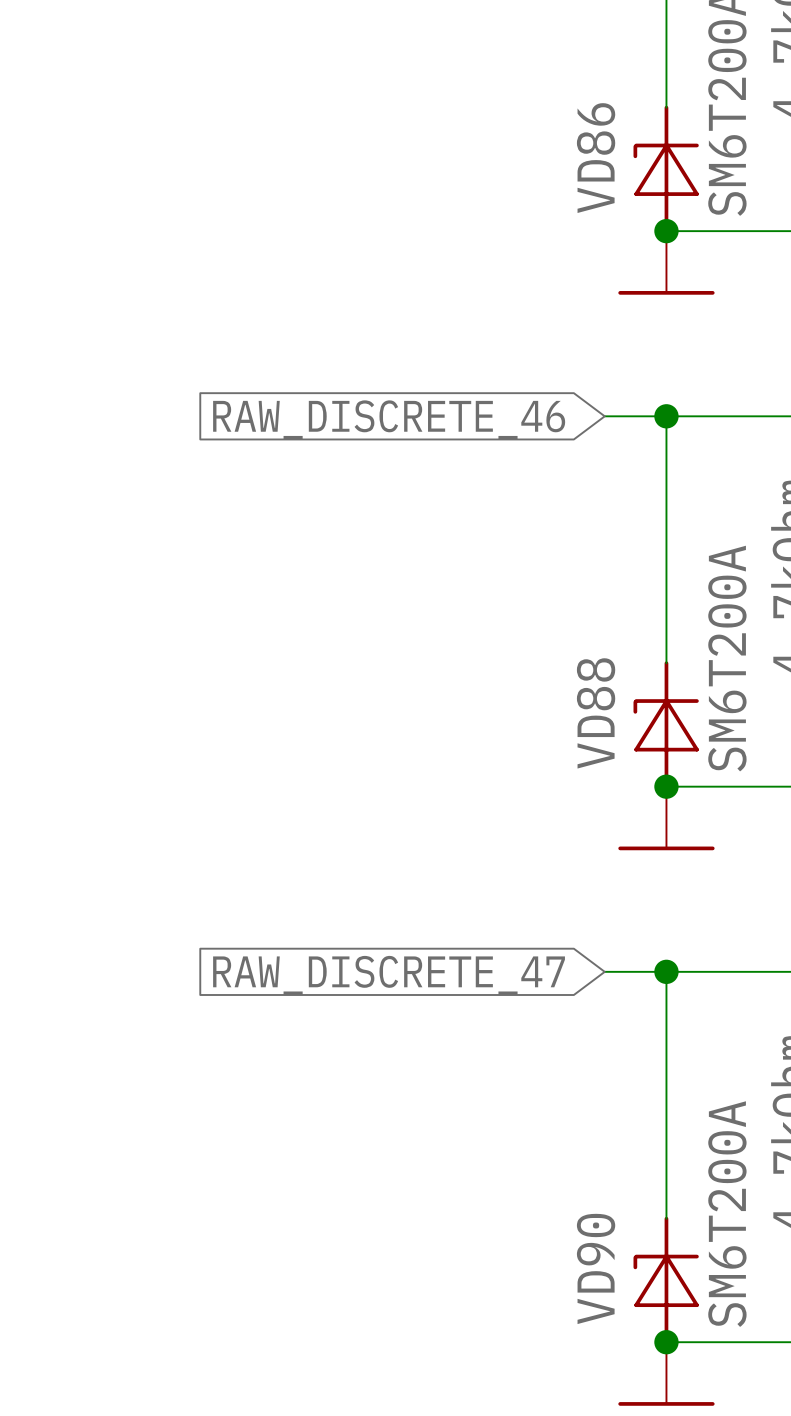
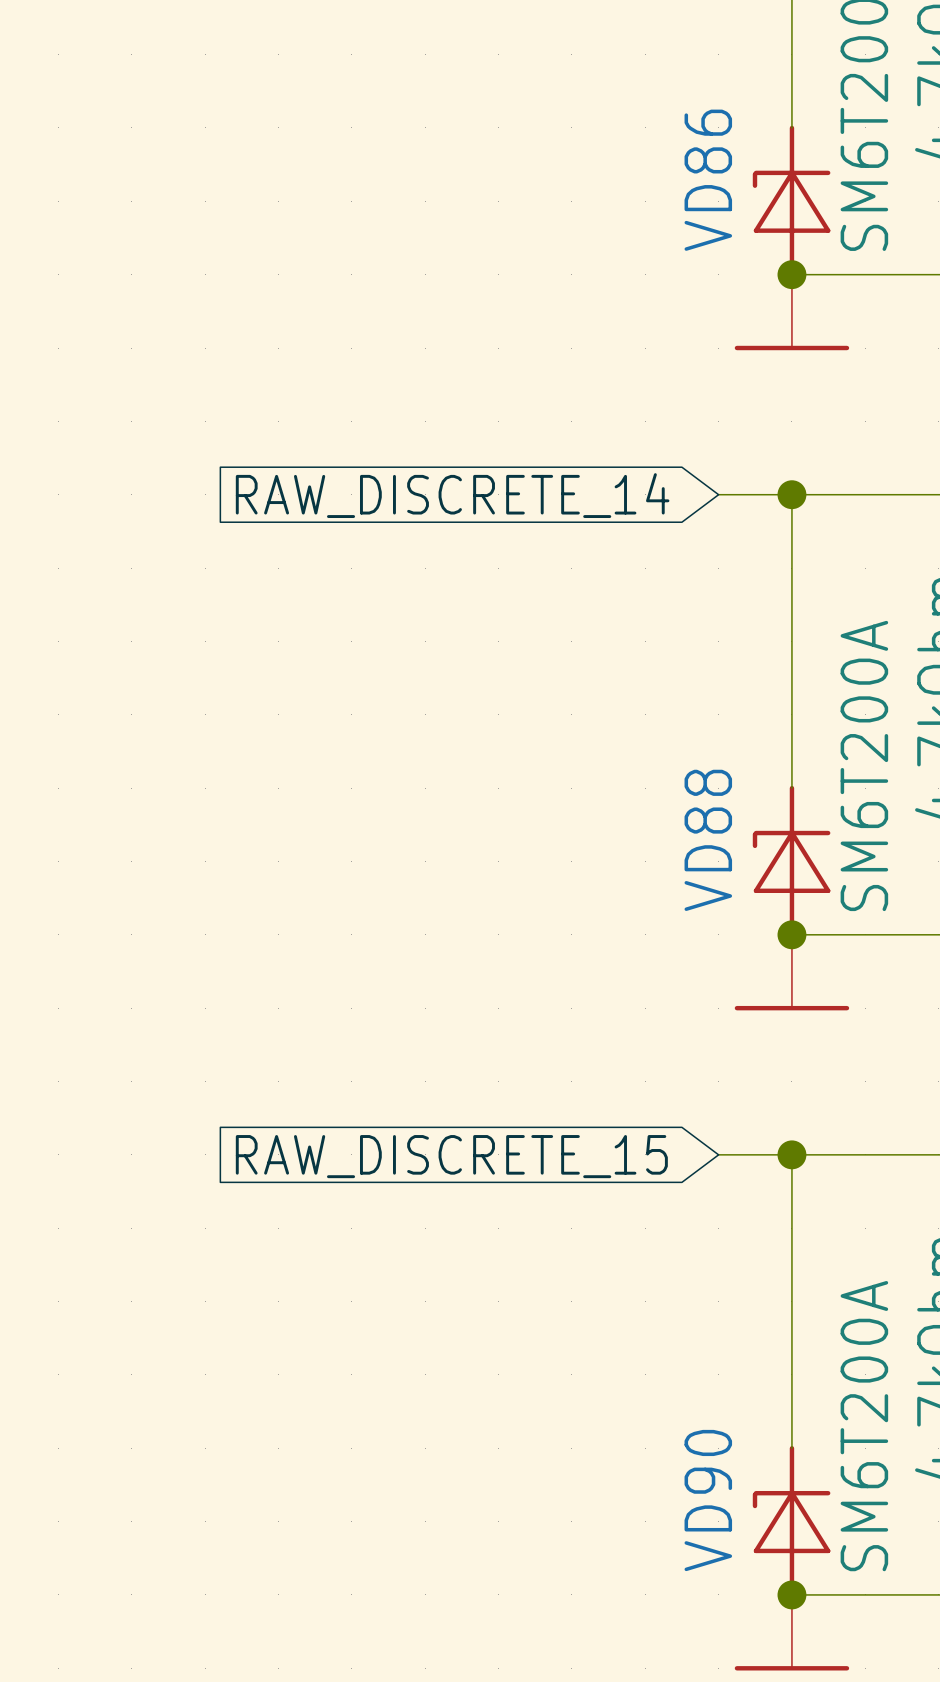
global label: RAW_DISCRETE_46 (389, 419) -> RAW_DISCRETE_14 (452, 495)
global label: RAW_DISCRETE_47 (389, 975) -> RAW_DISCRETE_15 (451, 1156)

